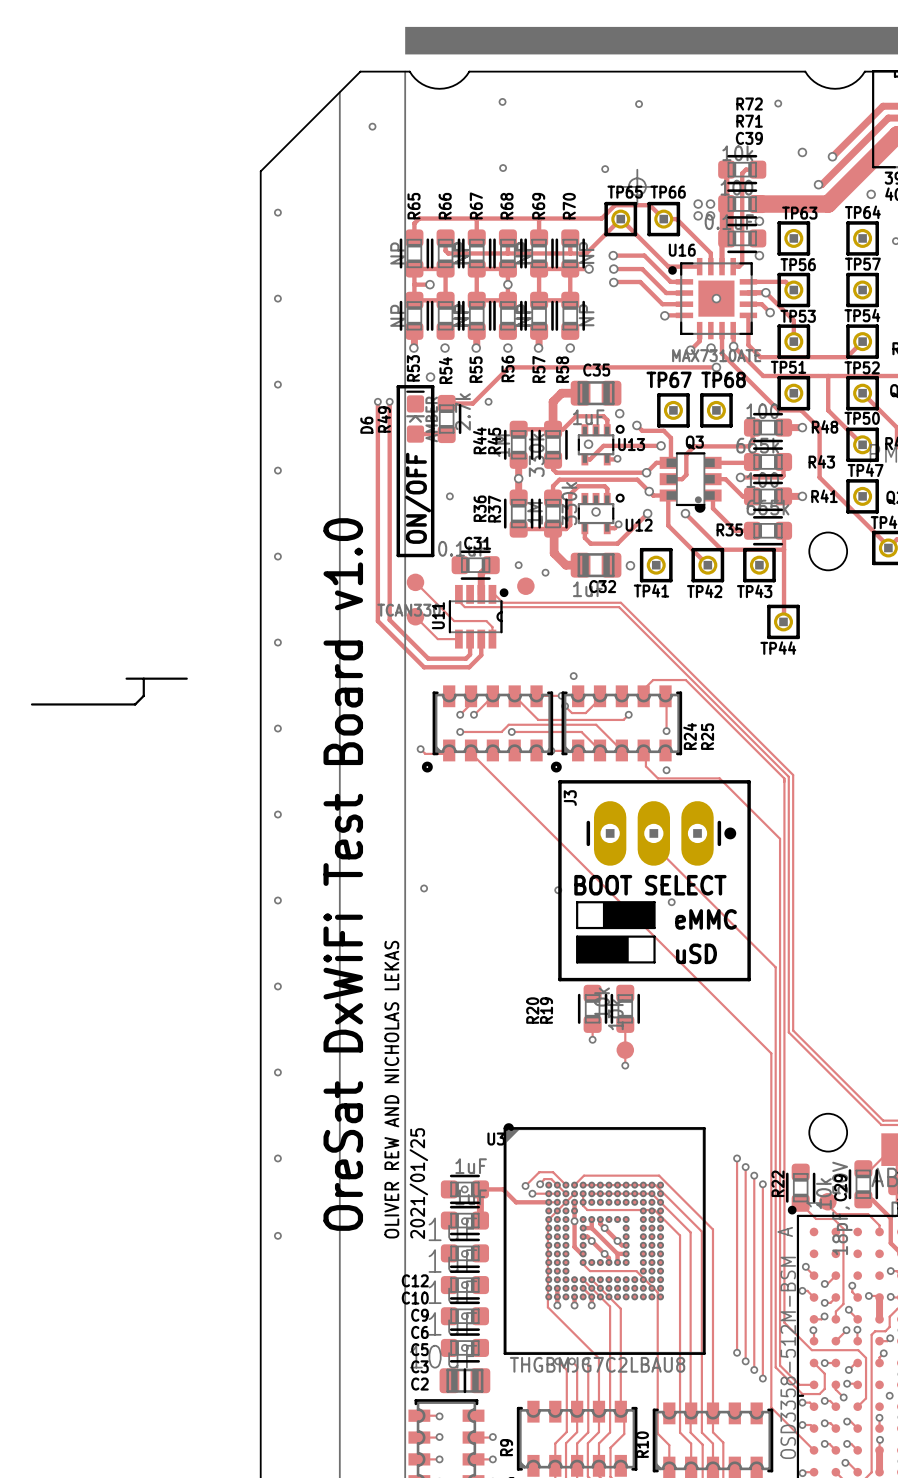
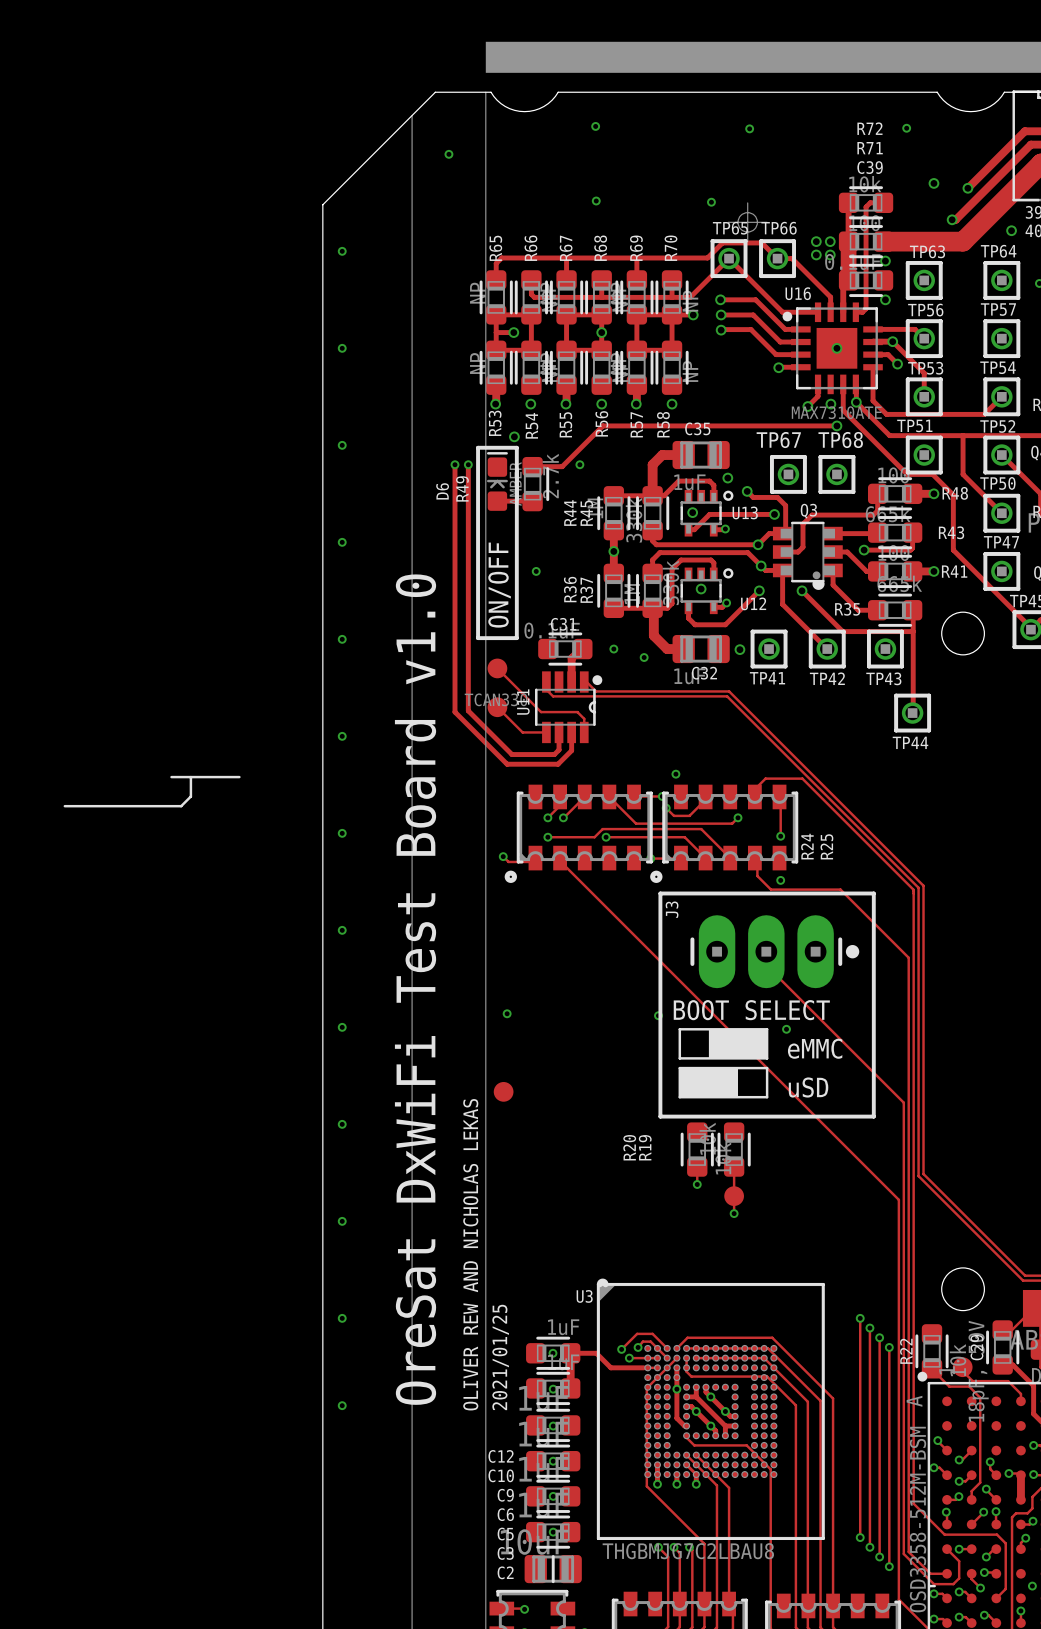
part position: (525, 586) -> (503, 1091)

